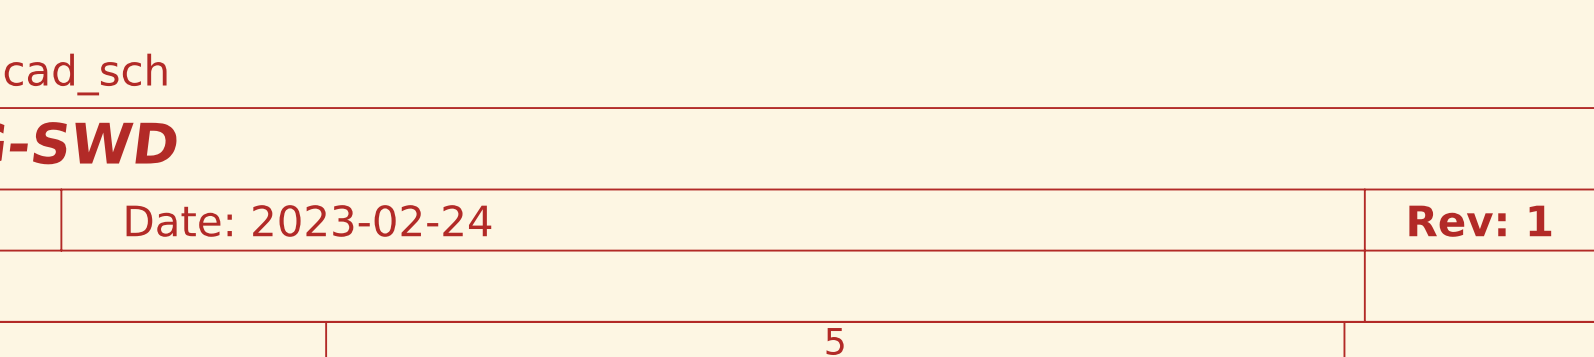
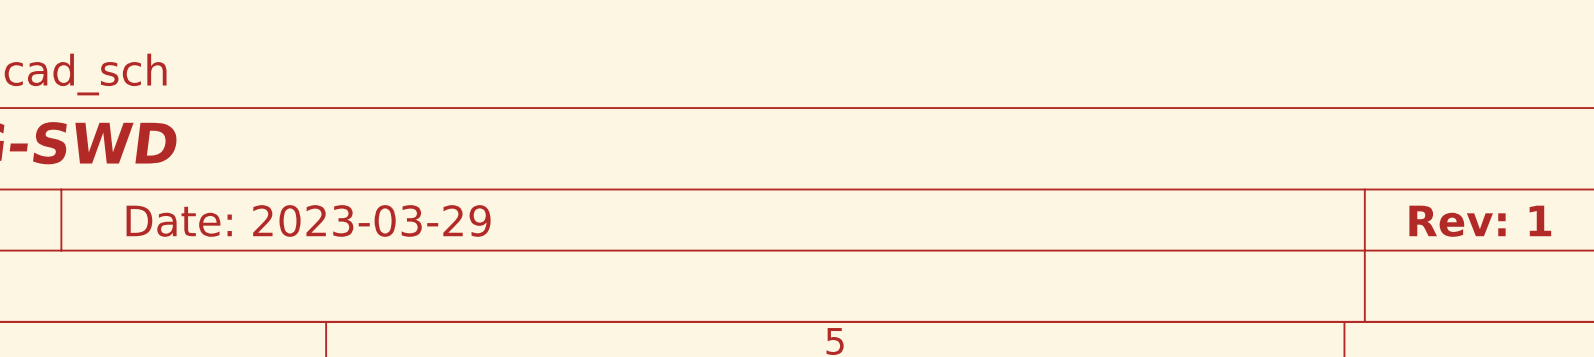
title block: Date: 2023-02-24 (308, 220) -> Date: 2023-03-29 (308, 220)

